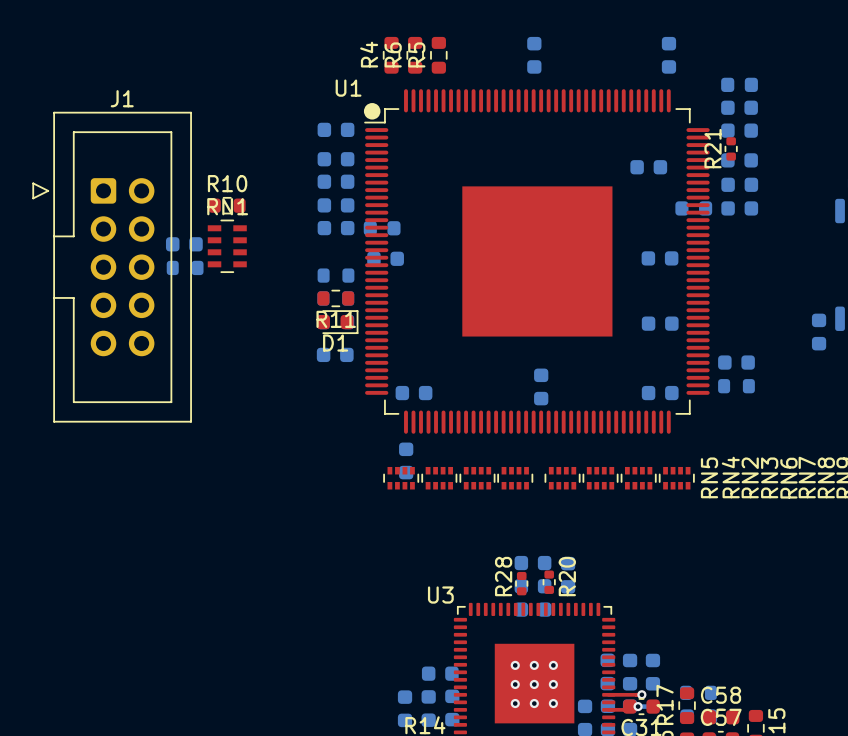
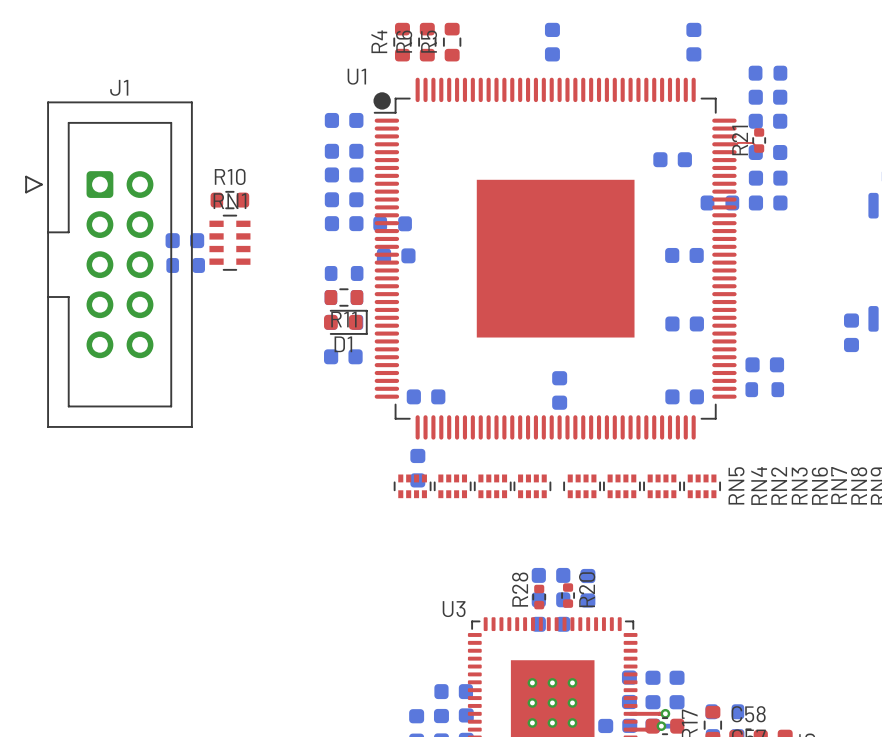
top track: none -> (747, 142) (724, 144)
top track: none -> (747, 143) (752, 143) (759, 148)

